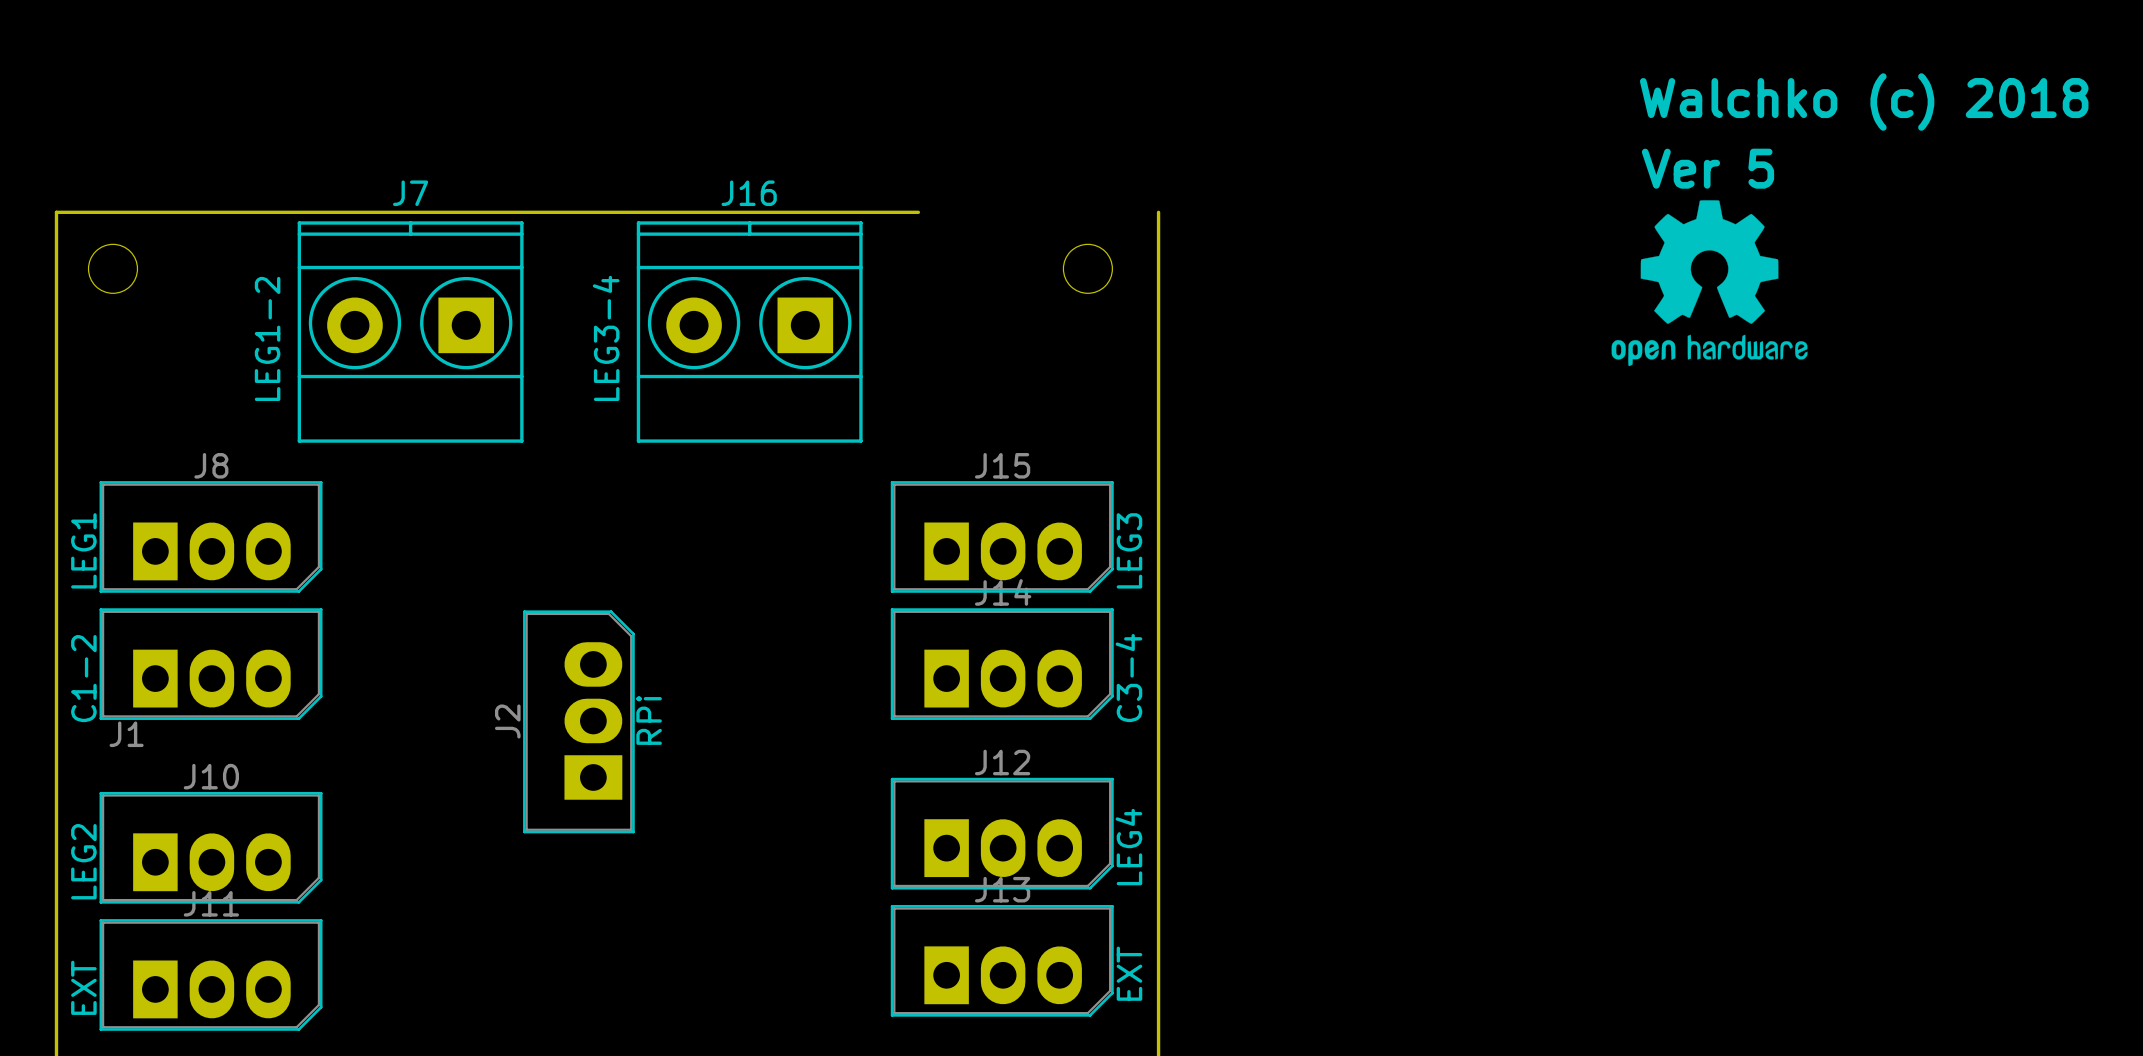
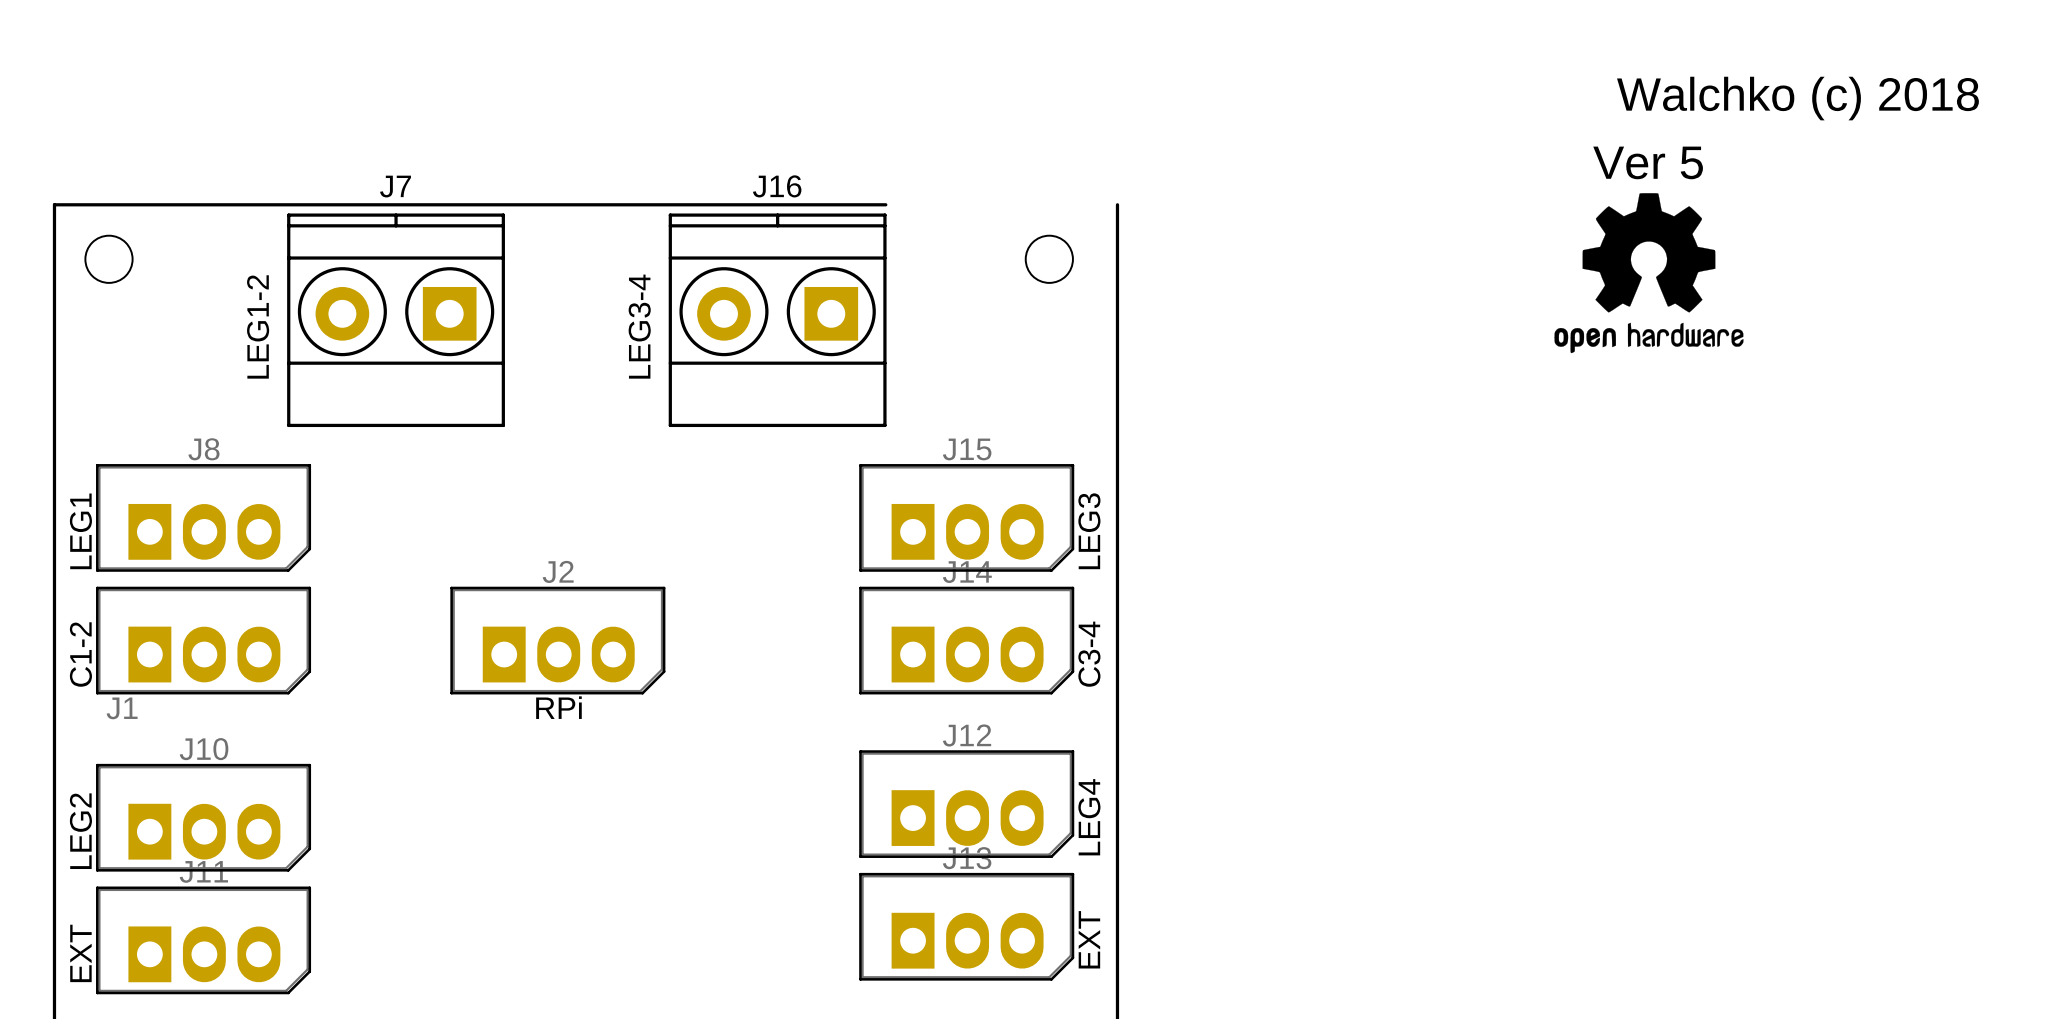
J16 position: (749, 332) -> (777, 320)
J2 rotation: 0° (578, 721) -> 90° clockwise (557, 640)

